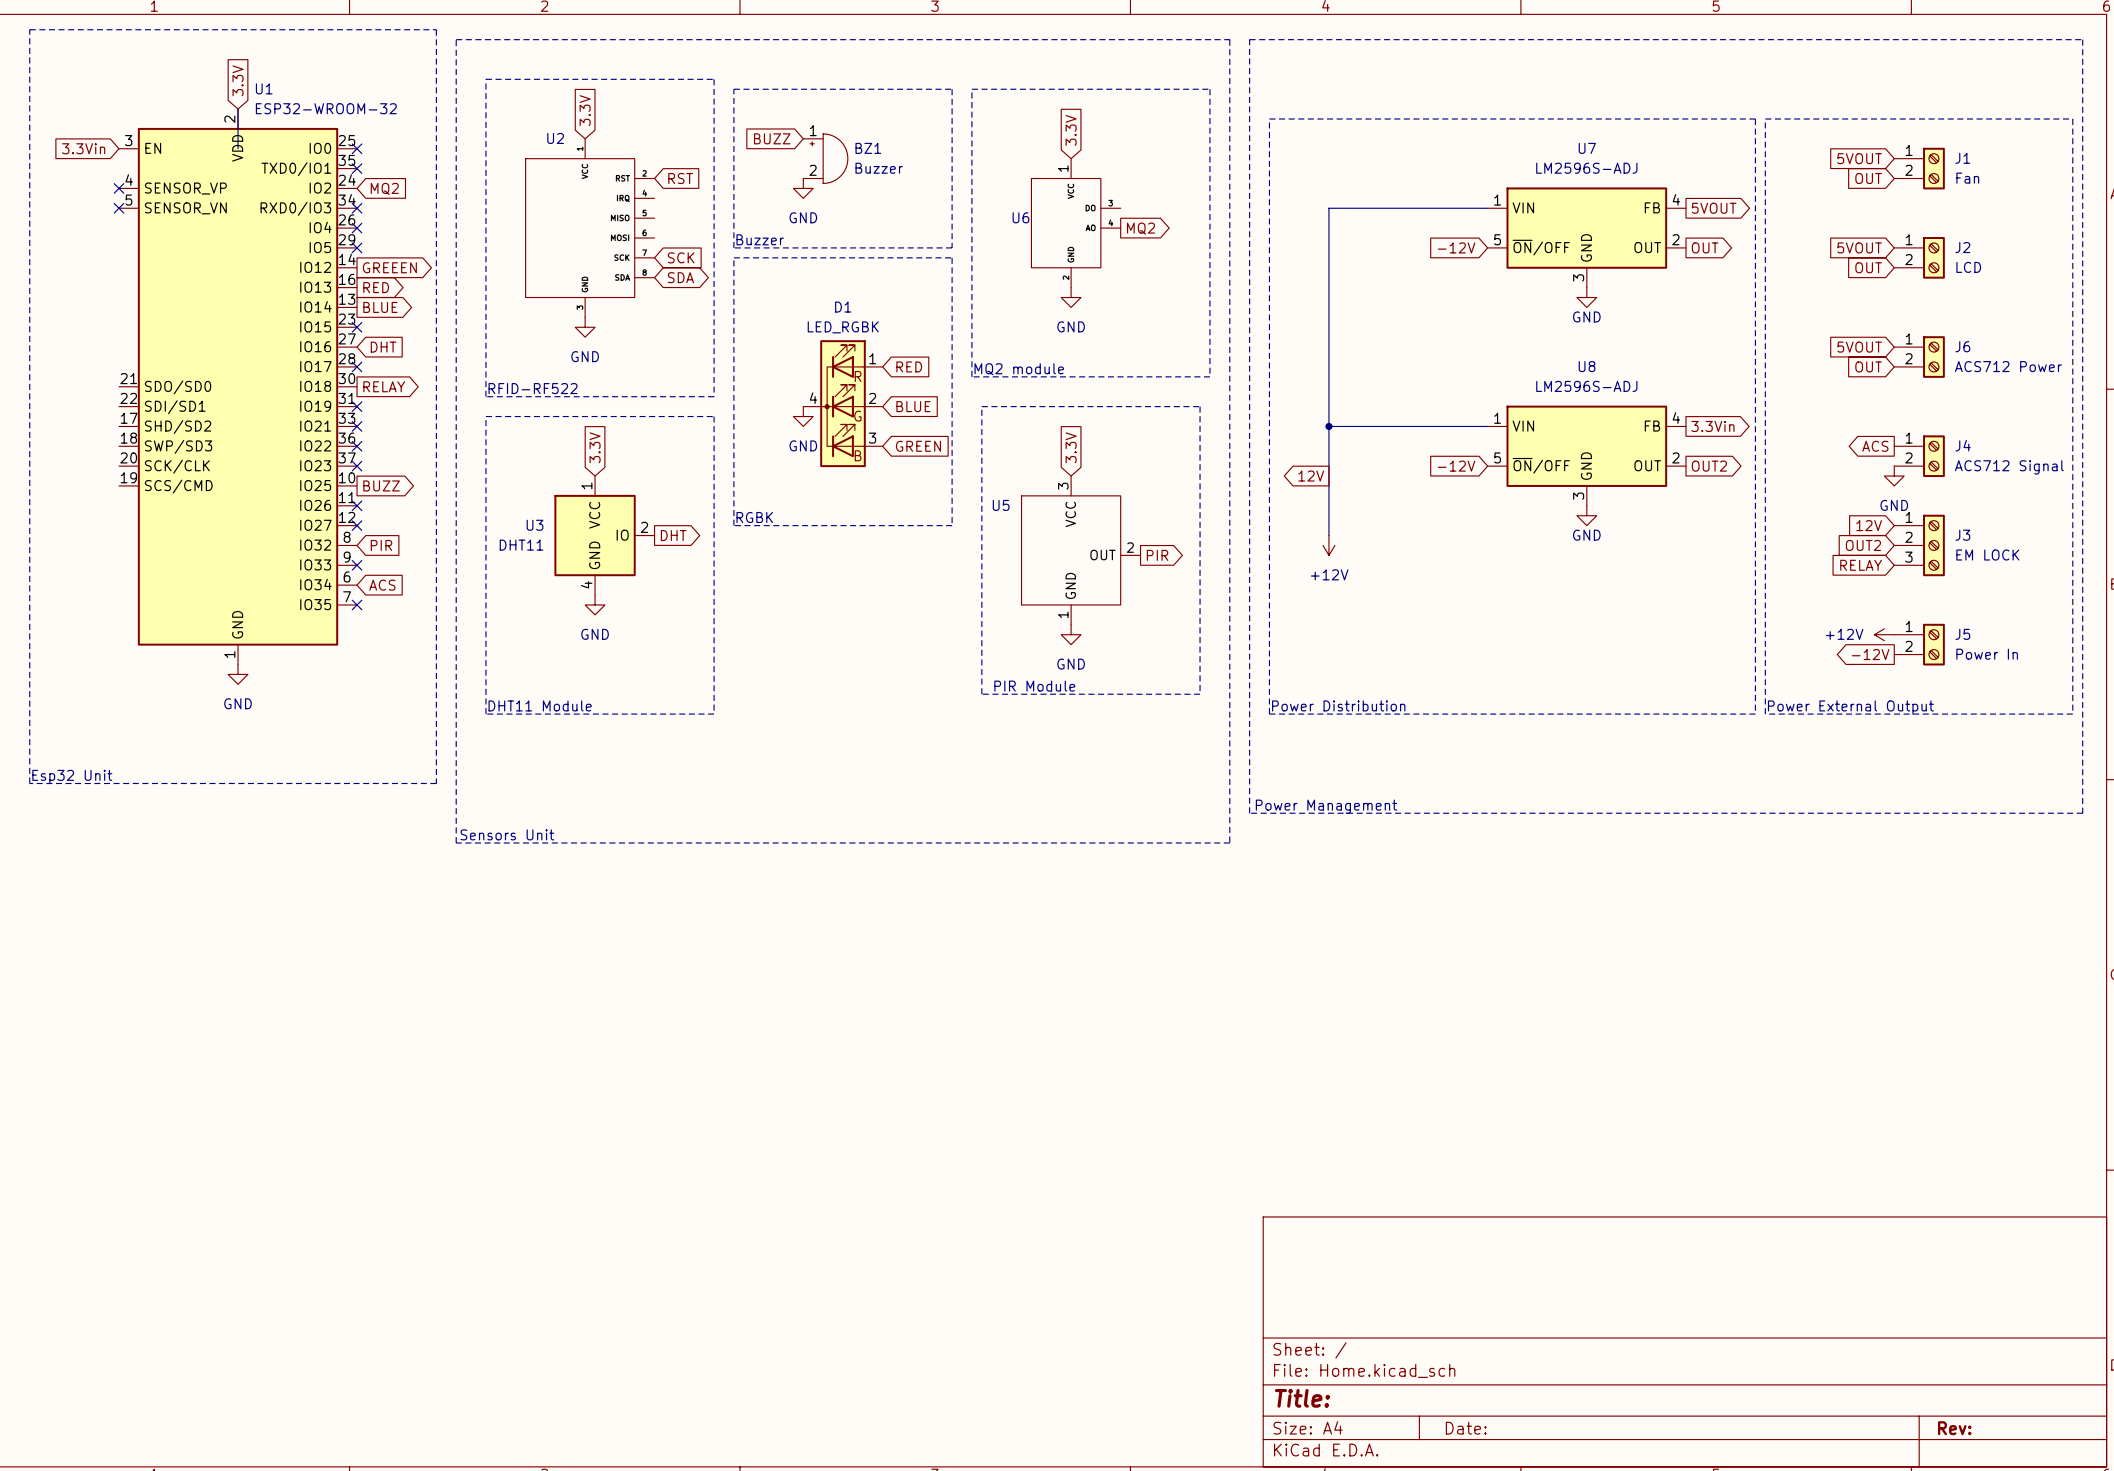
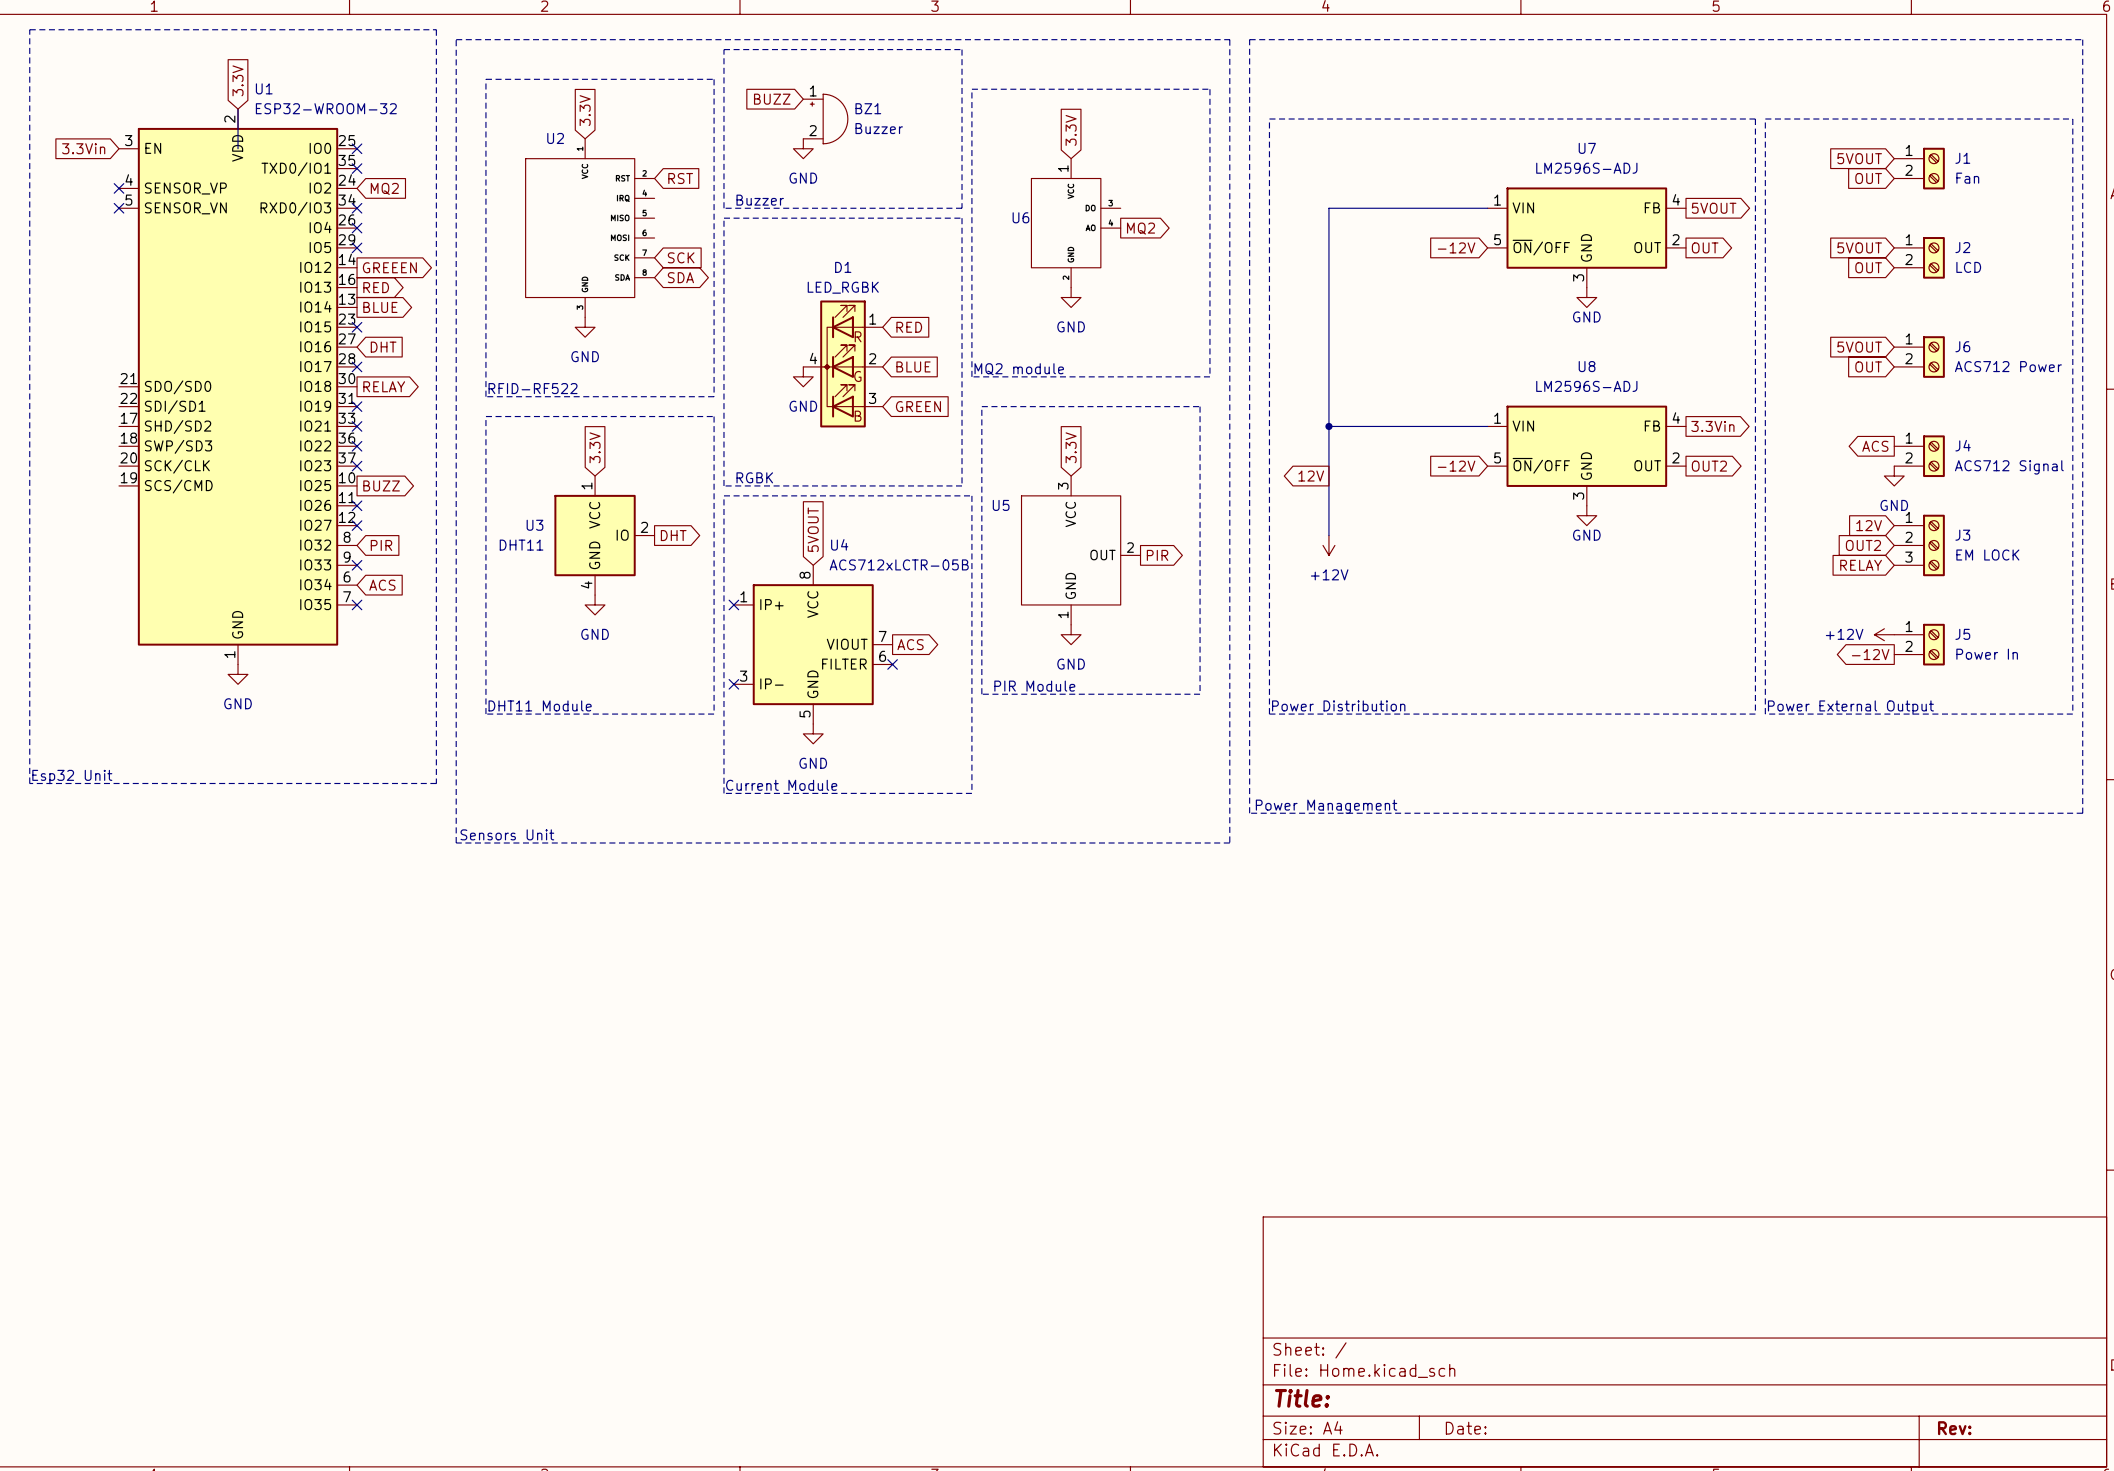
line: (733, 89) (952, 89) (952, 247) (733, 247) (733, 89) -> (723, 49) (723, 208) (962, 208) (962, 49) (723, 49)
global label position: BUZZ (772, 138) -> BUZZ (772, 99)
BZ1 position: (825, 158) -> (825, 119)
power symbol position: GND (803, 188) -> GND (803, 148)
text position: Buzzer (760, 239) -> Buzzer (760, 200)
line: (733, 257) (952, 257) (952, 525) (733, 525) (733, 257) -> (723, 218) (723, 485) (962, 485) (962, 218) (723, 218)
global label: none -> RED (909, 327)
global label: RED (909, 366) -> BLUE (913, 366)
D1 position: (842, 403) -> (842, 363)
global label: BLUE (913, 406) -> GREEN (918, 406)
power symbol position: GND (803, 416) -> GND (803, 376)
global label: GREEN (918, 446) -> none
line: none -> (723, 495) (971, 495) (971, 793) (723, 793) (723, 495)
text position: RGBK (754, 517) -> RGBK (754, 477)
global label: none -> 5VOUT (813, 529)
no-connect mark: none -> (733, 604)
U4: none -> ACS712xLCTR-05B (813, 644)
global label: none -> ACS (910, 644)
no-connect mark: none -> (892, 664)
no-connect mark: none -> (733, 684)
power symbol: none -> GND (813, 733)
text: none -> Current Module (781, 785)

